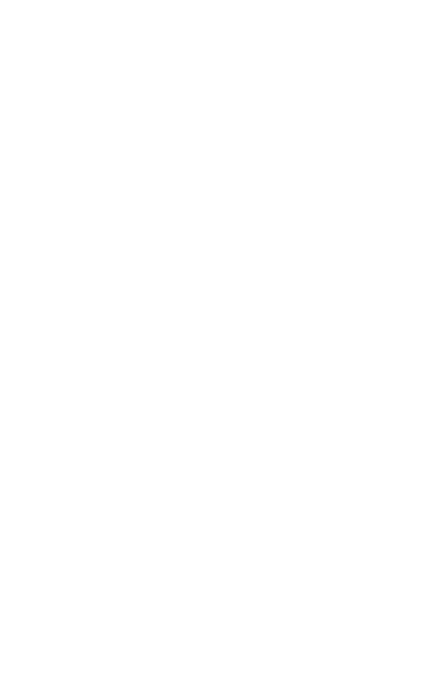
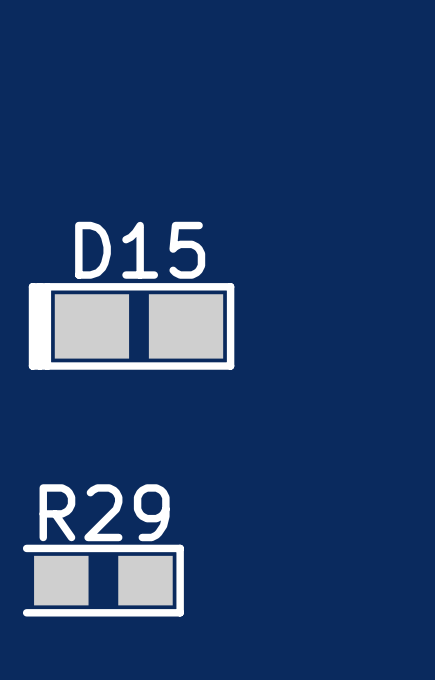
D15: none -> (131, 326)
R29: none -> (103, 580)

